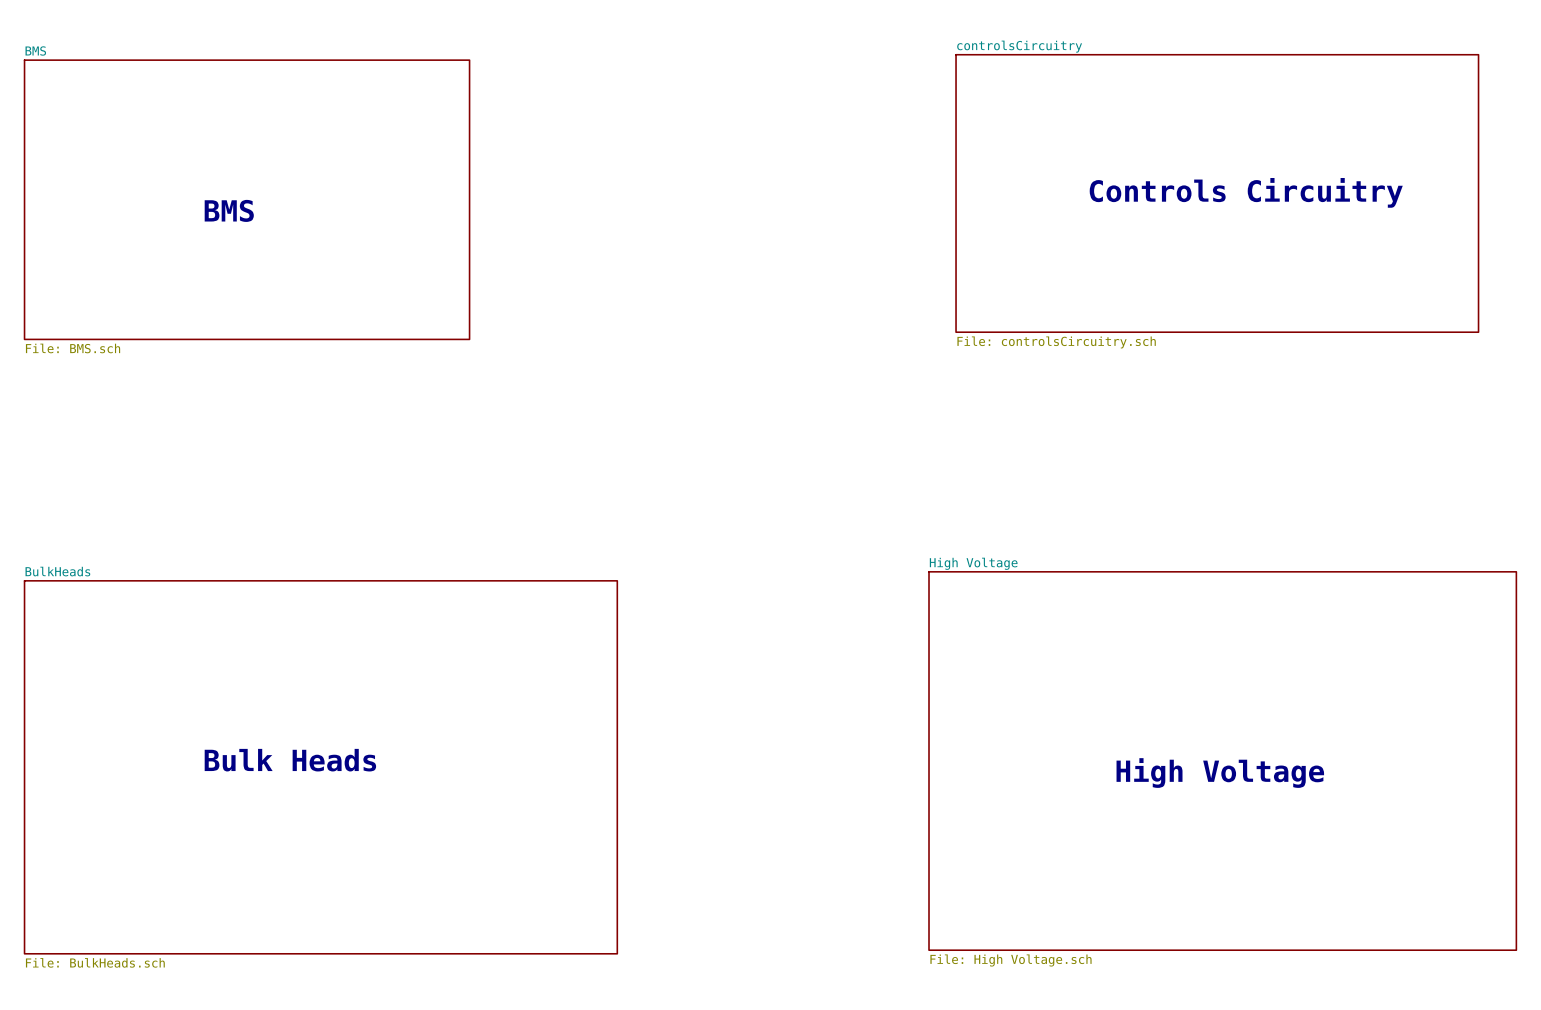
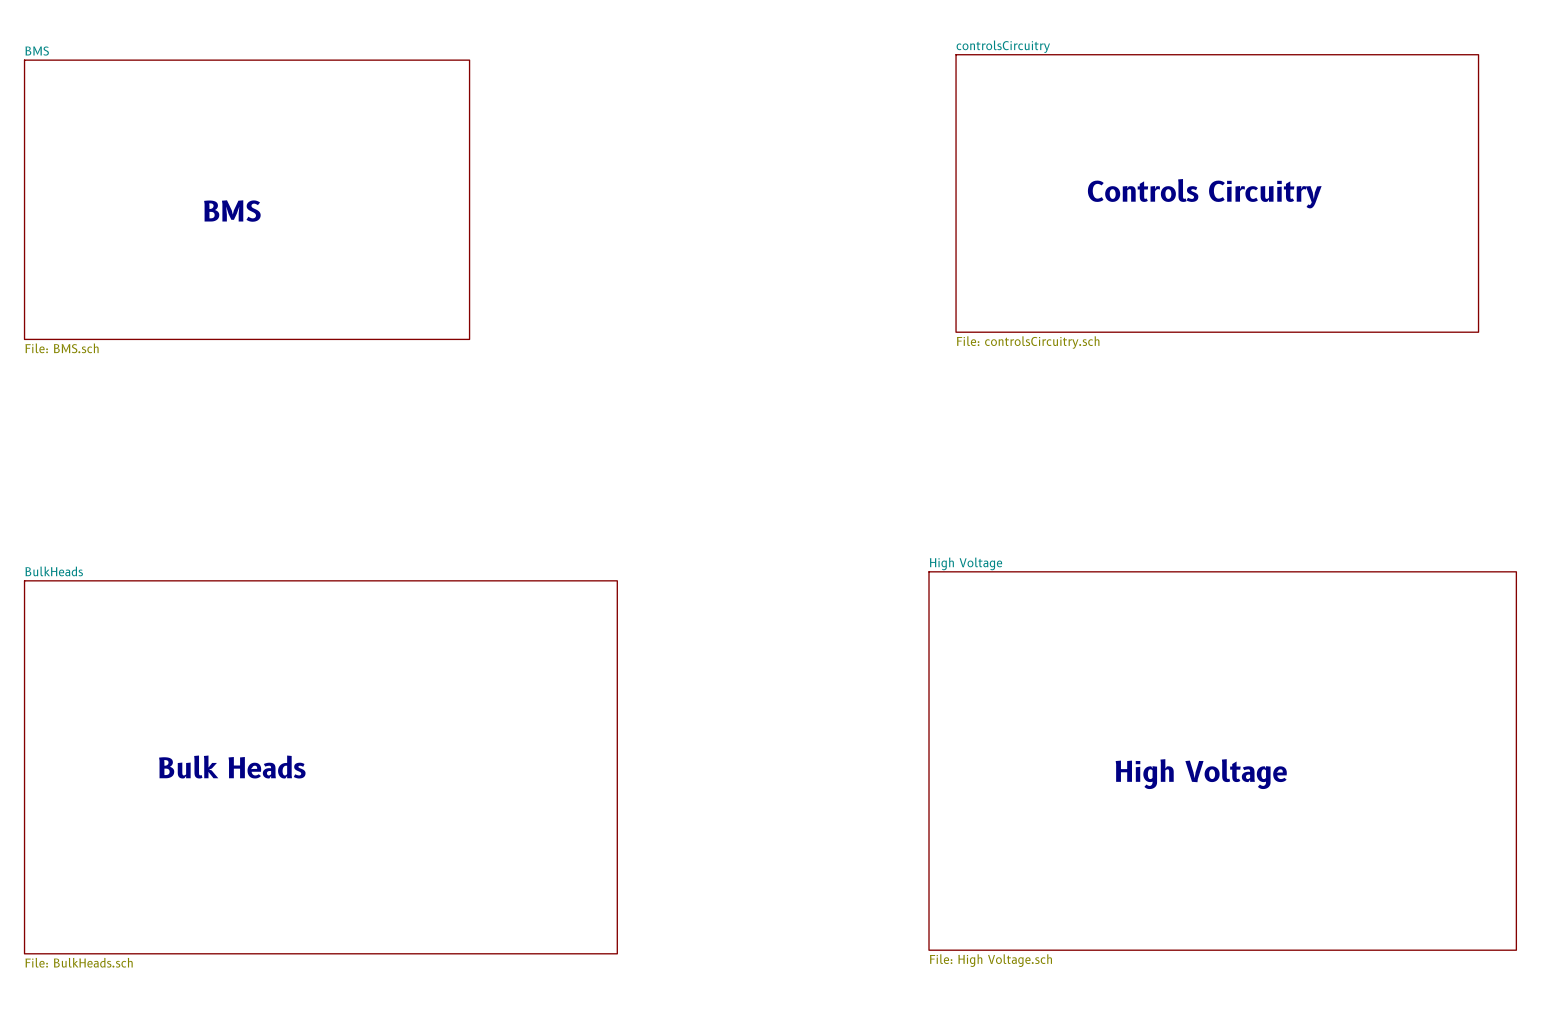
text position: Bulk Heads (290, 760) -> Bulk Heads (232, 767)

